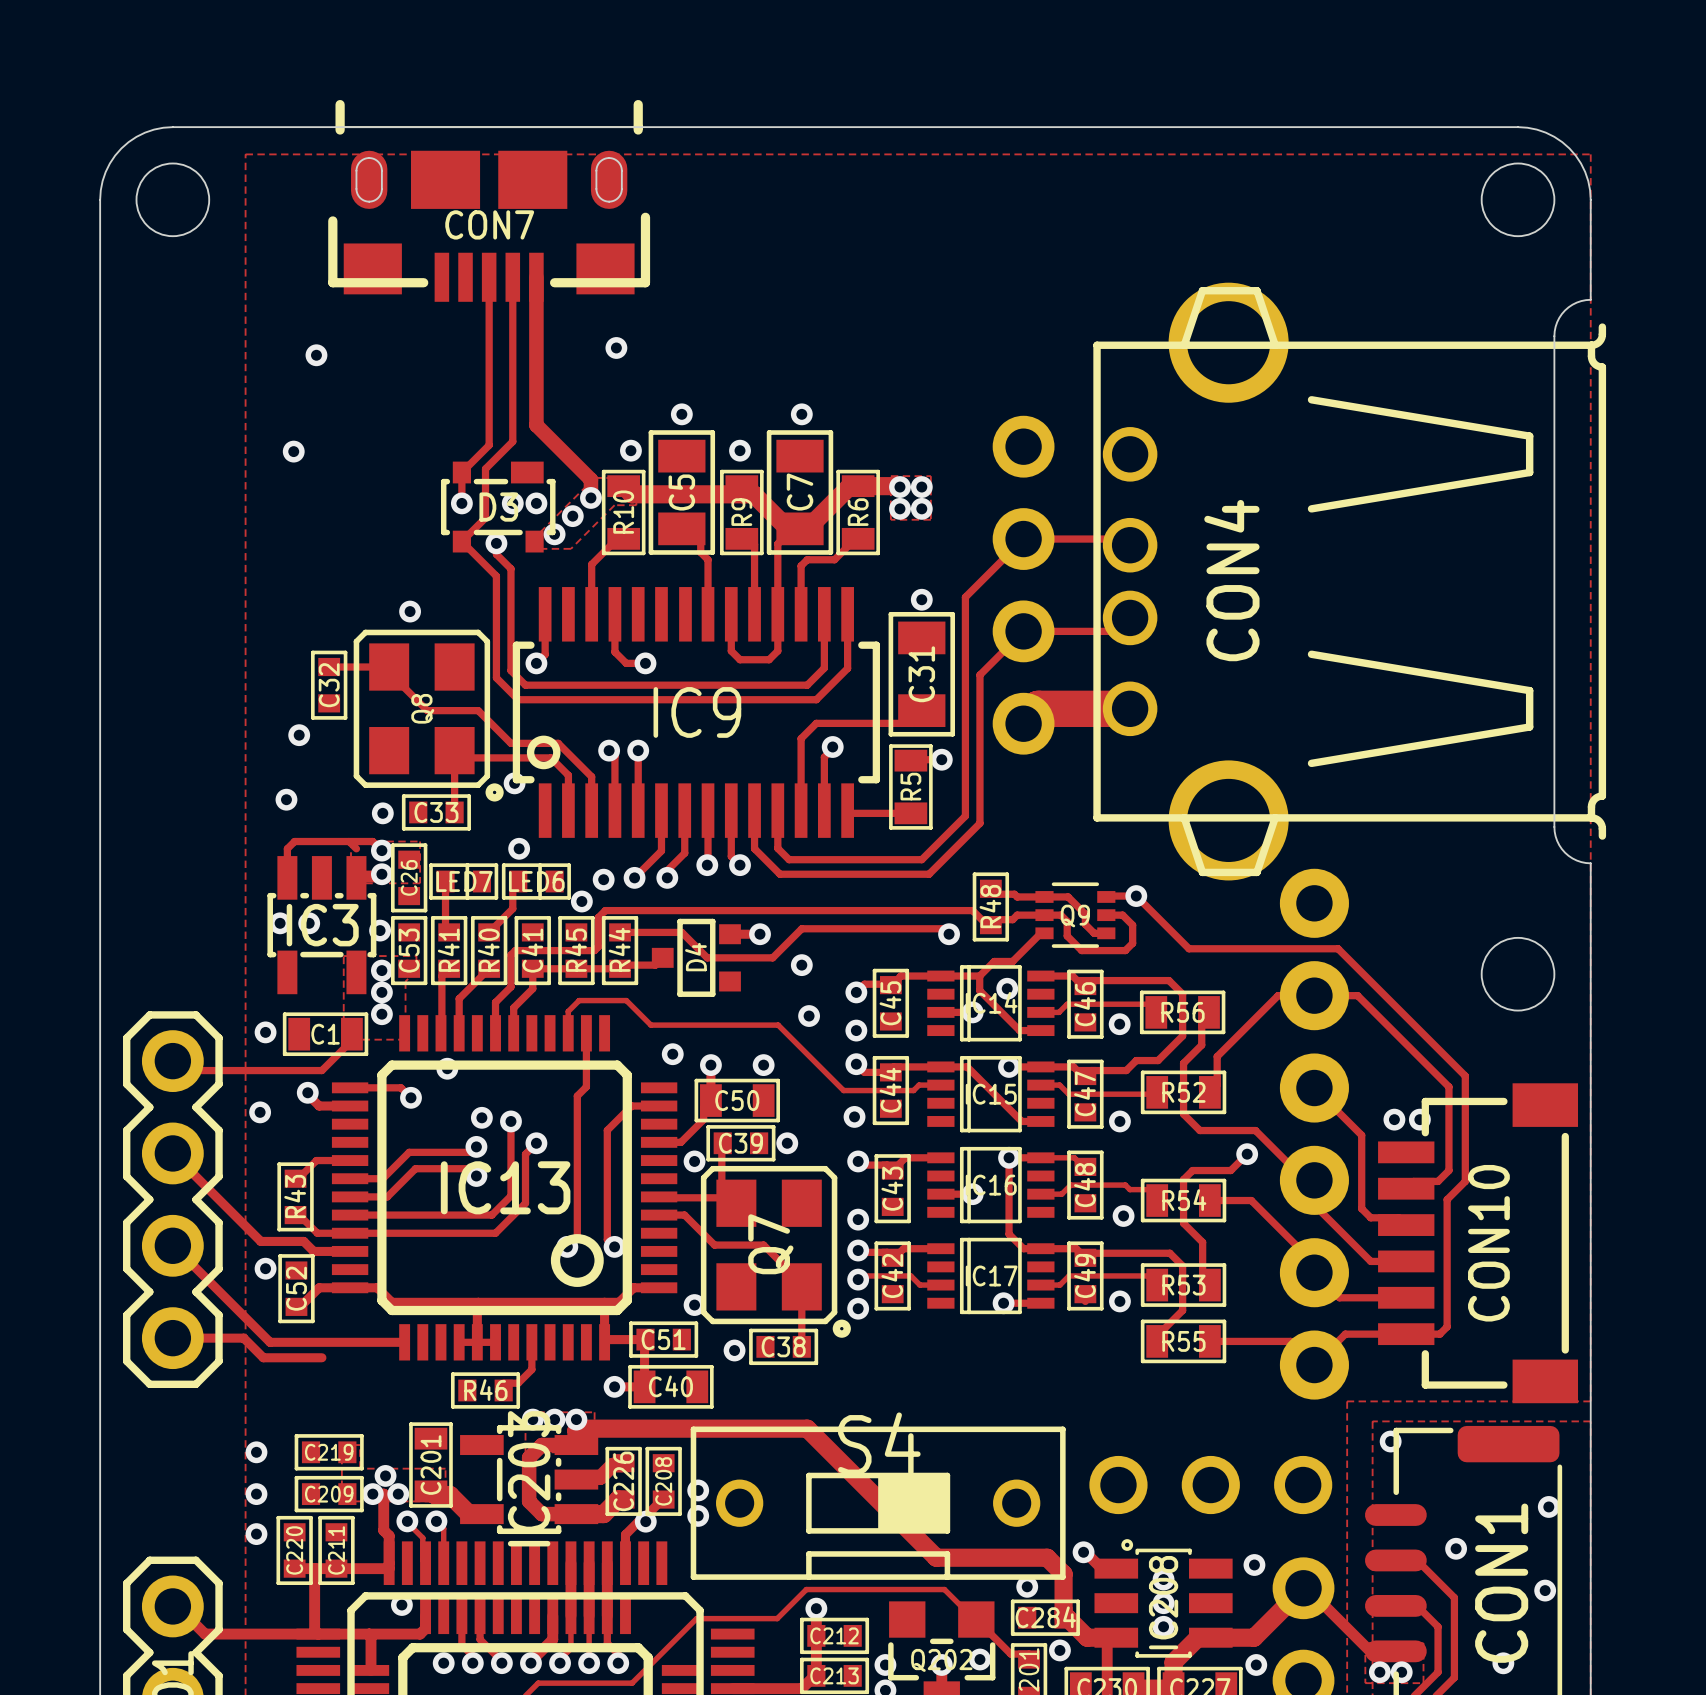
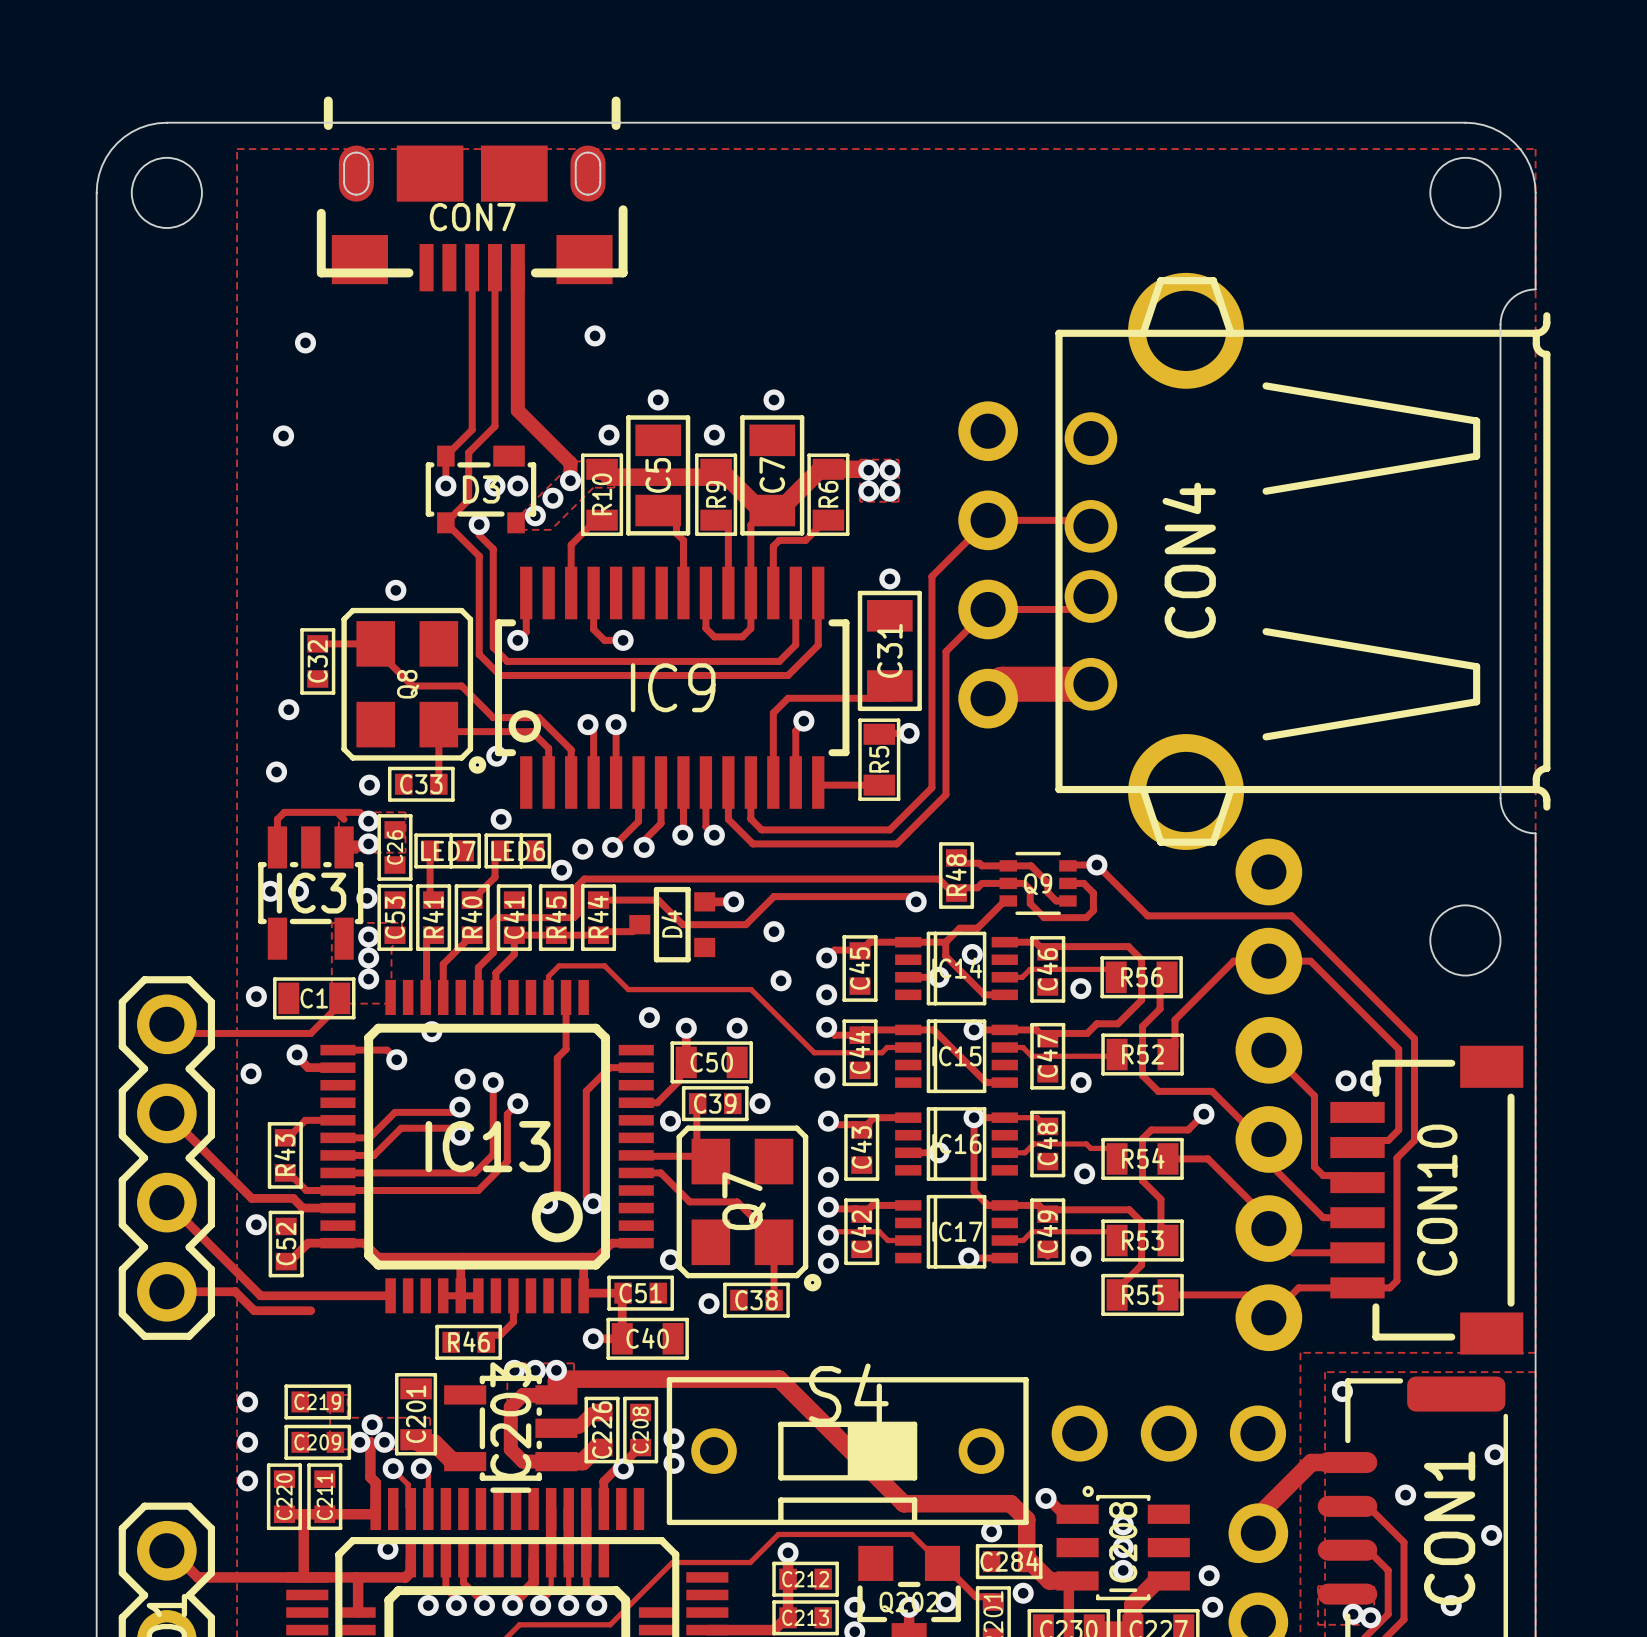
track: none -> (1356, 1462) (1311, 1462) (1258, 1515) (1258, 1533)
via: (1254, 1565) -> none
via: none -> (1209, 1575)
track: (1210, 1637) (1254, 1637) (1303, 1588) (1307, 1588) (1370, 1651) (1395, 1651) -> none
via position: (1379, 1672) -> (1370, 1617)

